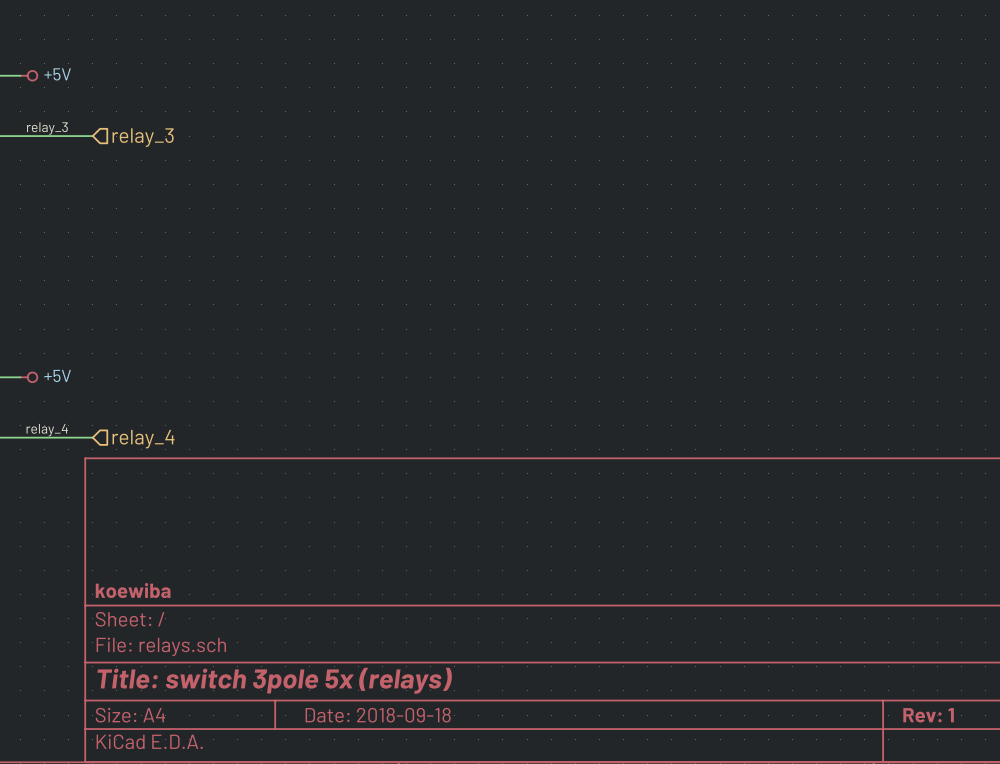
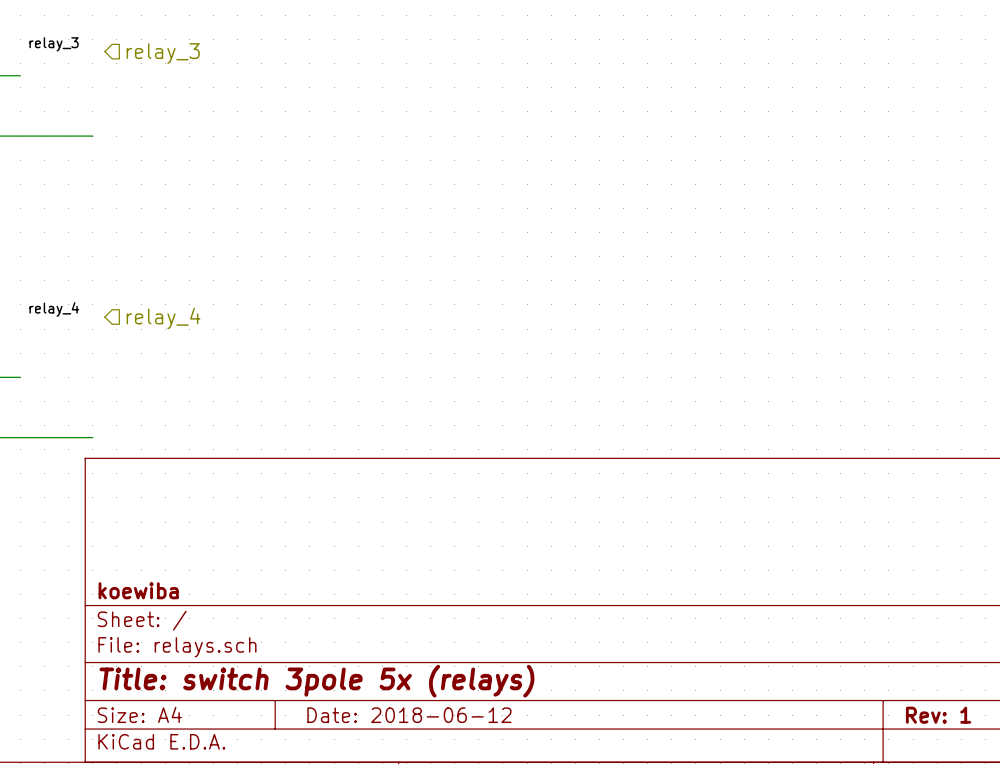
power symbol: +5V (28, 75) -> none
label position: relay_3 (47, 128) -> relay_3 (54, 44)
hierarchical label position: relay_3 (143, 137) -> relay_3 (163, 53)
power symbol: +5V (28, 377) -> none
label position: relay_4 (47, 430) -> relay_4 (54, 309)
hierarchical label position: relay_4 (143, 439) -> relay_4 (163, 318)
title block: Date: 2018-09-18 (378, 715) -> Date: 2018-06-12 (409, 715)

